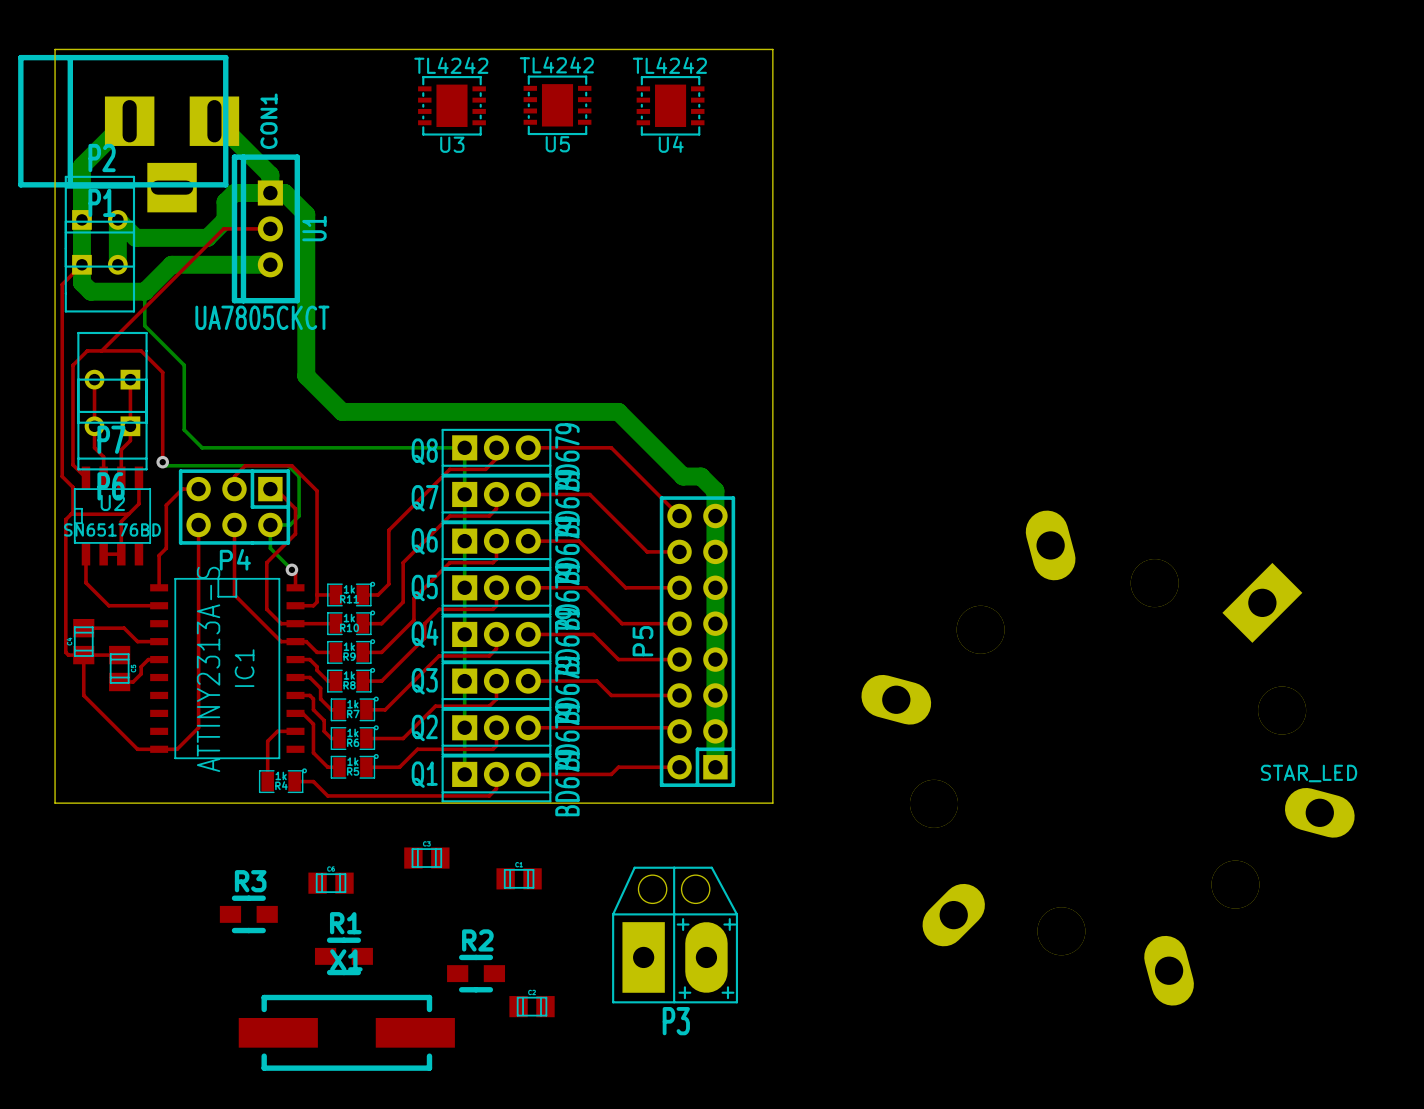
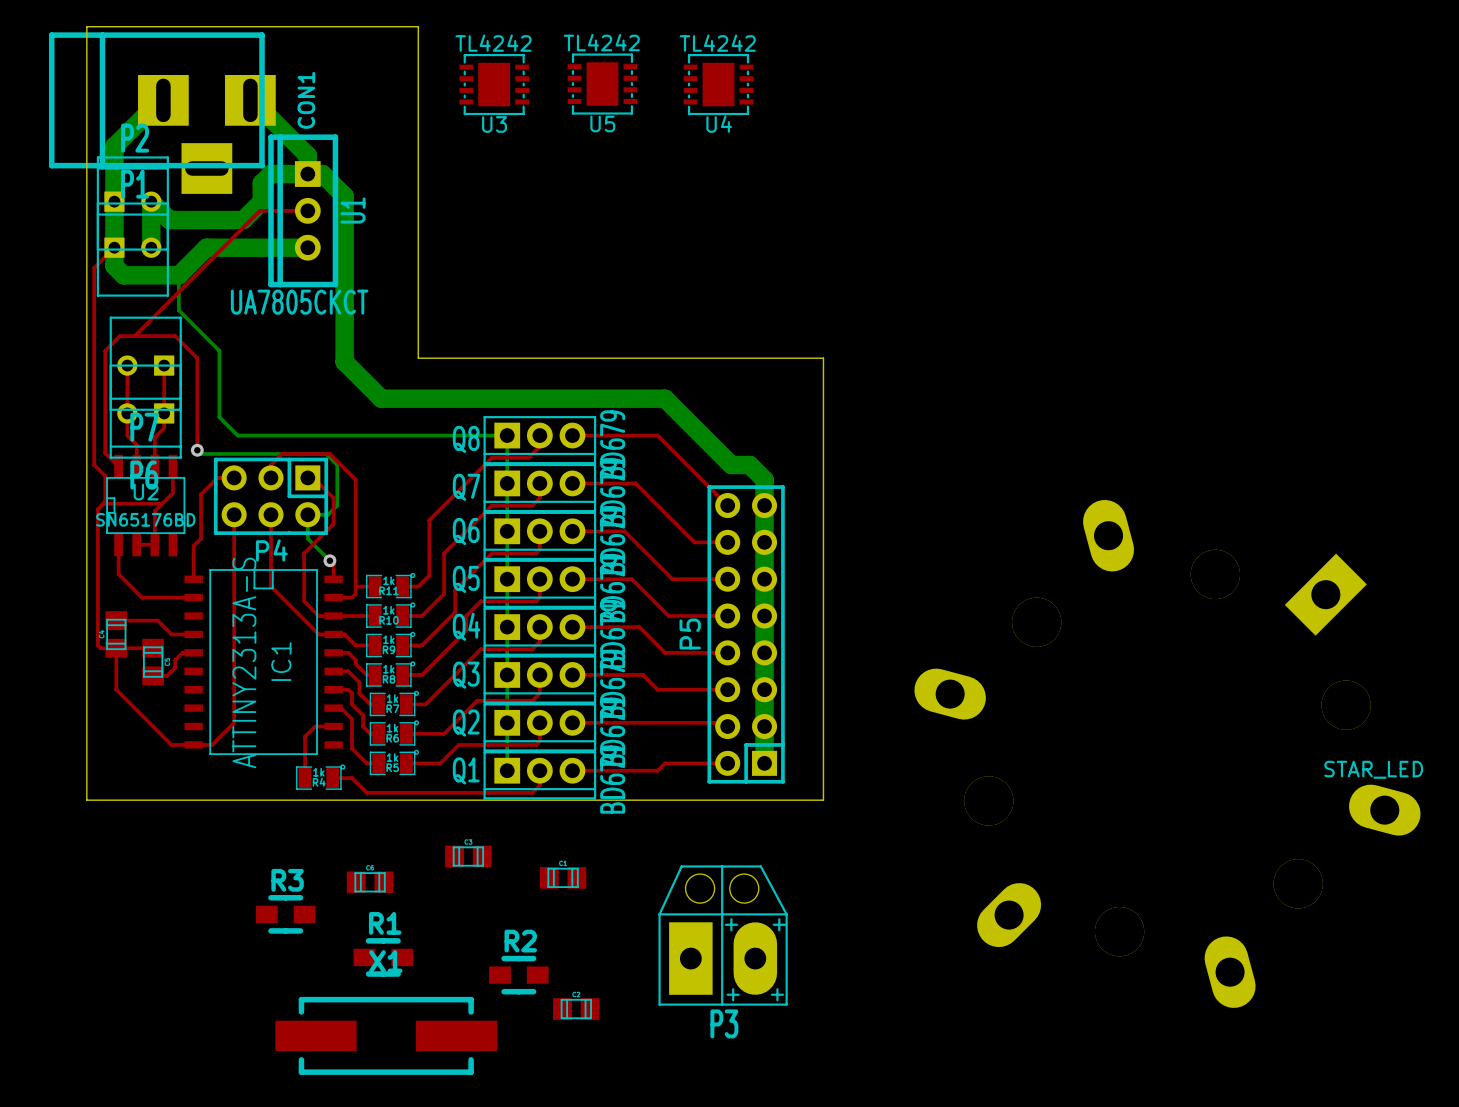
board edge: (378, 49) (772, 49) (772, 372) -> (418, 26) (418, 358) (823, 358)

